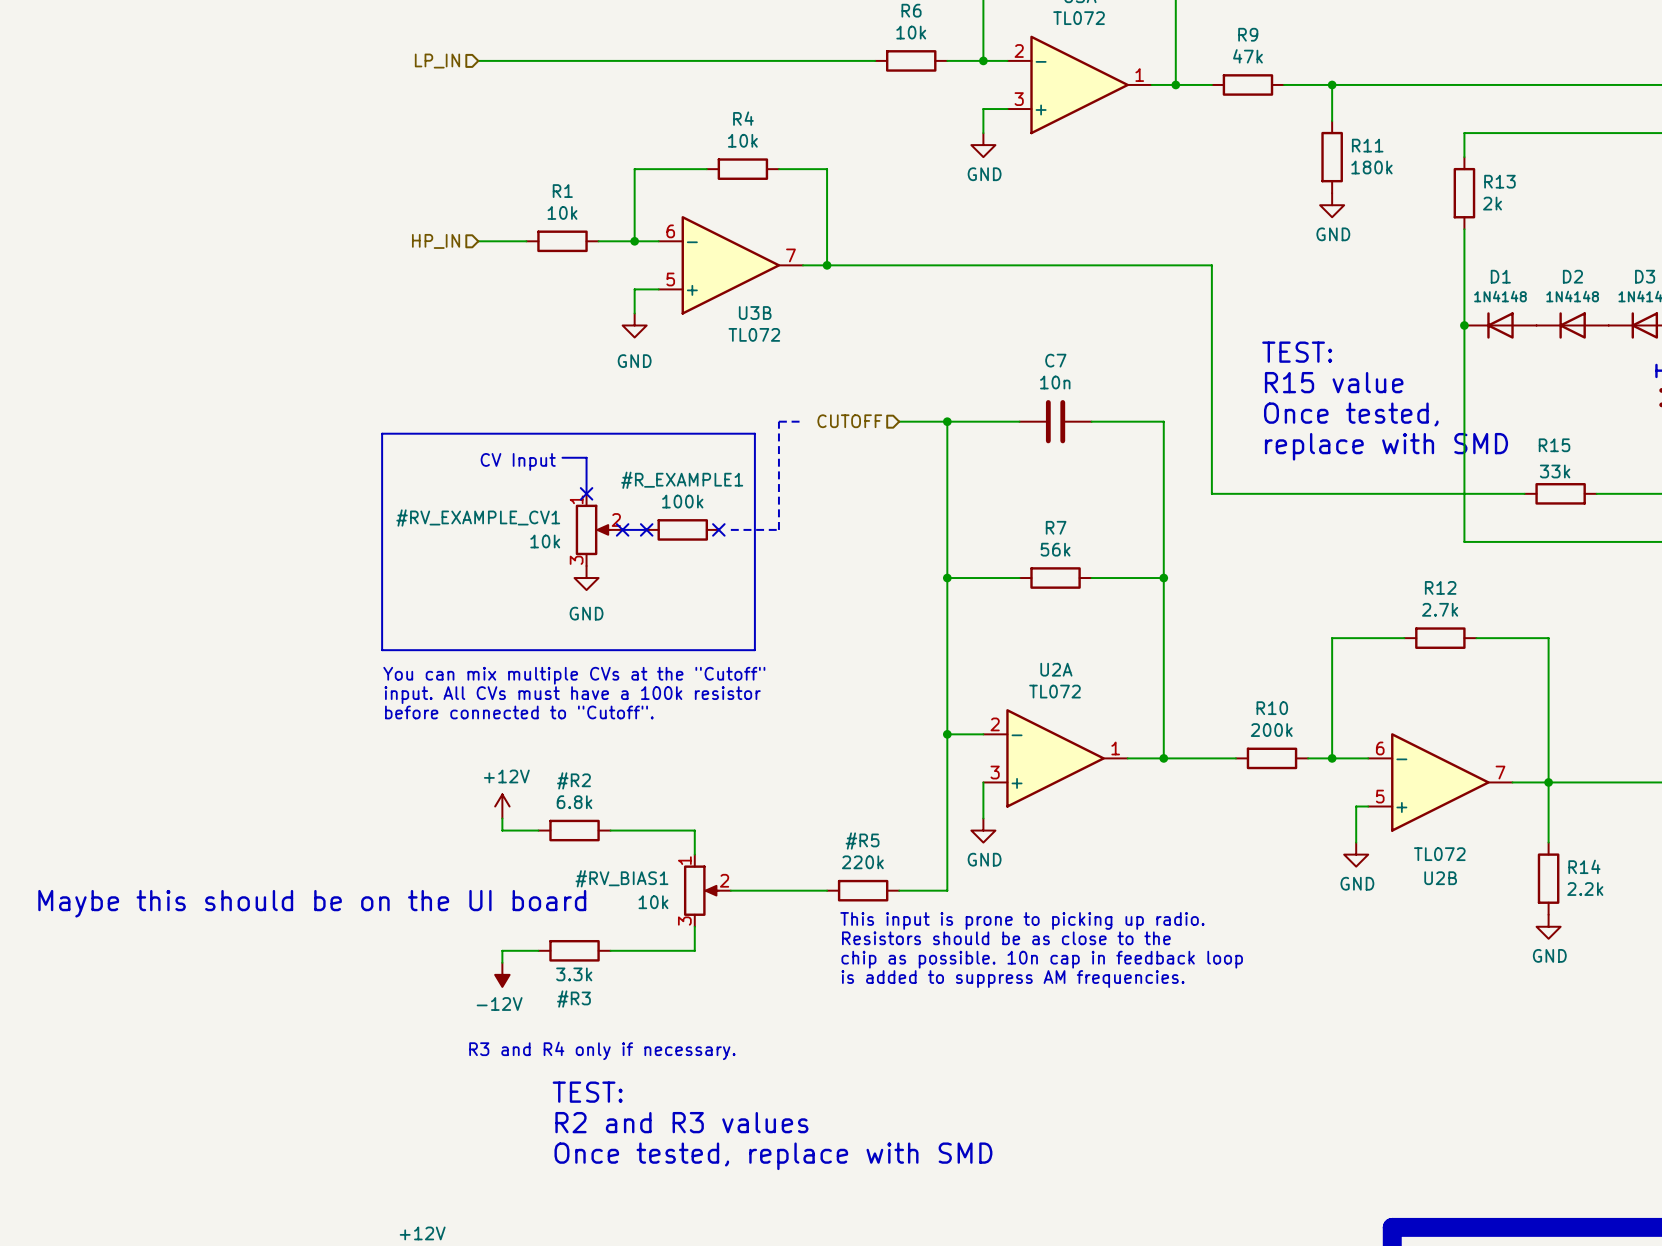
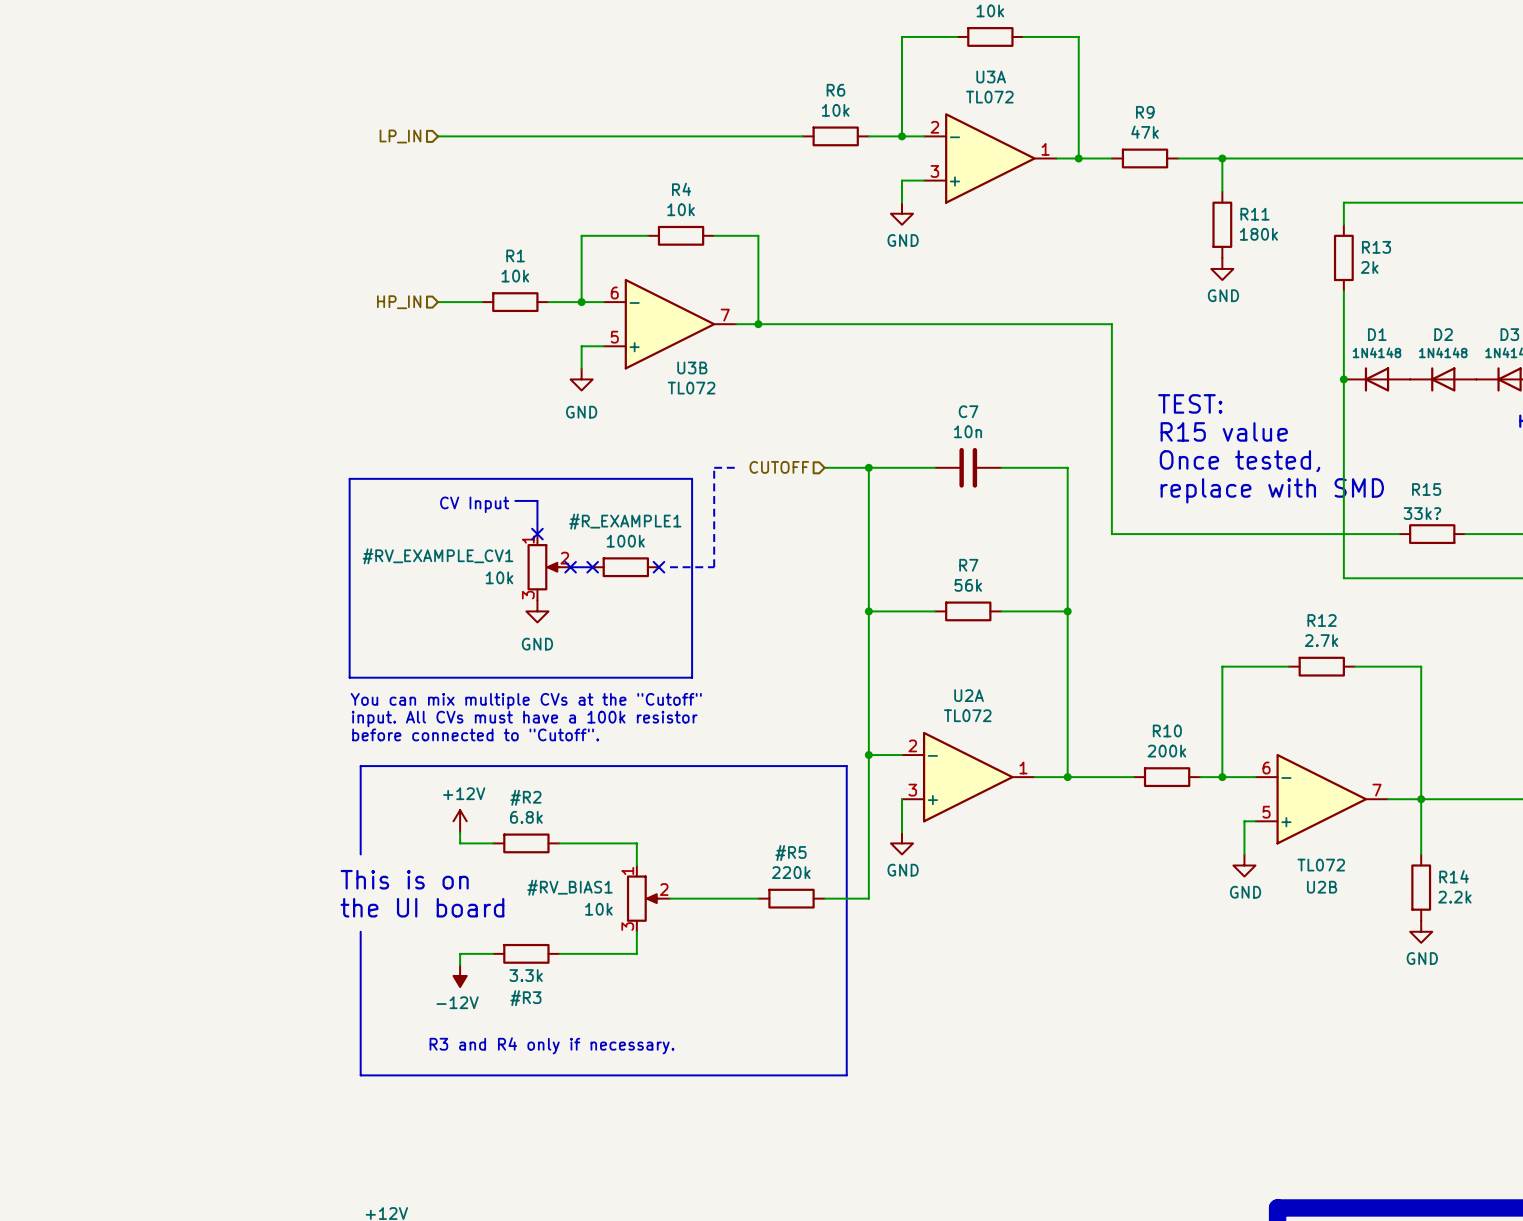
R15 value: 33k (1555, 471) -> 33k? (1422, 513)
line: none -> (360, 854) (360, 766) (846, 766) (846, 1075) (360, 1075) (360, 931)
text: none -> This is on (404, 879)
text: none -> the UI board (422, 907)
text: Maybe this should be on the UI board (312, 903) -> none
text: This input is prone to picking up radio. (1022, 920) -> none
text: Resistors should be as close to the (1006, 938) -> none
text: chip as possible. 10n cap in feedback loop (1042, 959) -> none
text: is added to suppress AM frequencies. (1012, 979) -> none
text: TEST: (587, 1092) -> none
text: R2 and R3 values (681, 1122) -> none
text: Once tested, replace with SMD (773, 1156) -> none

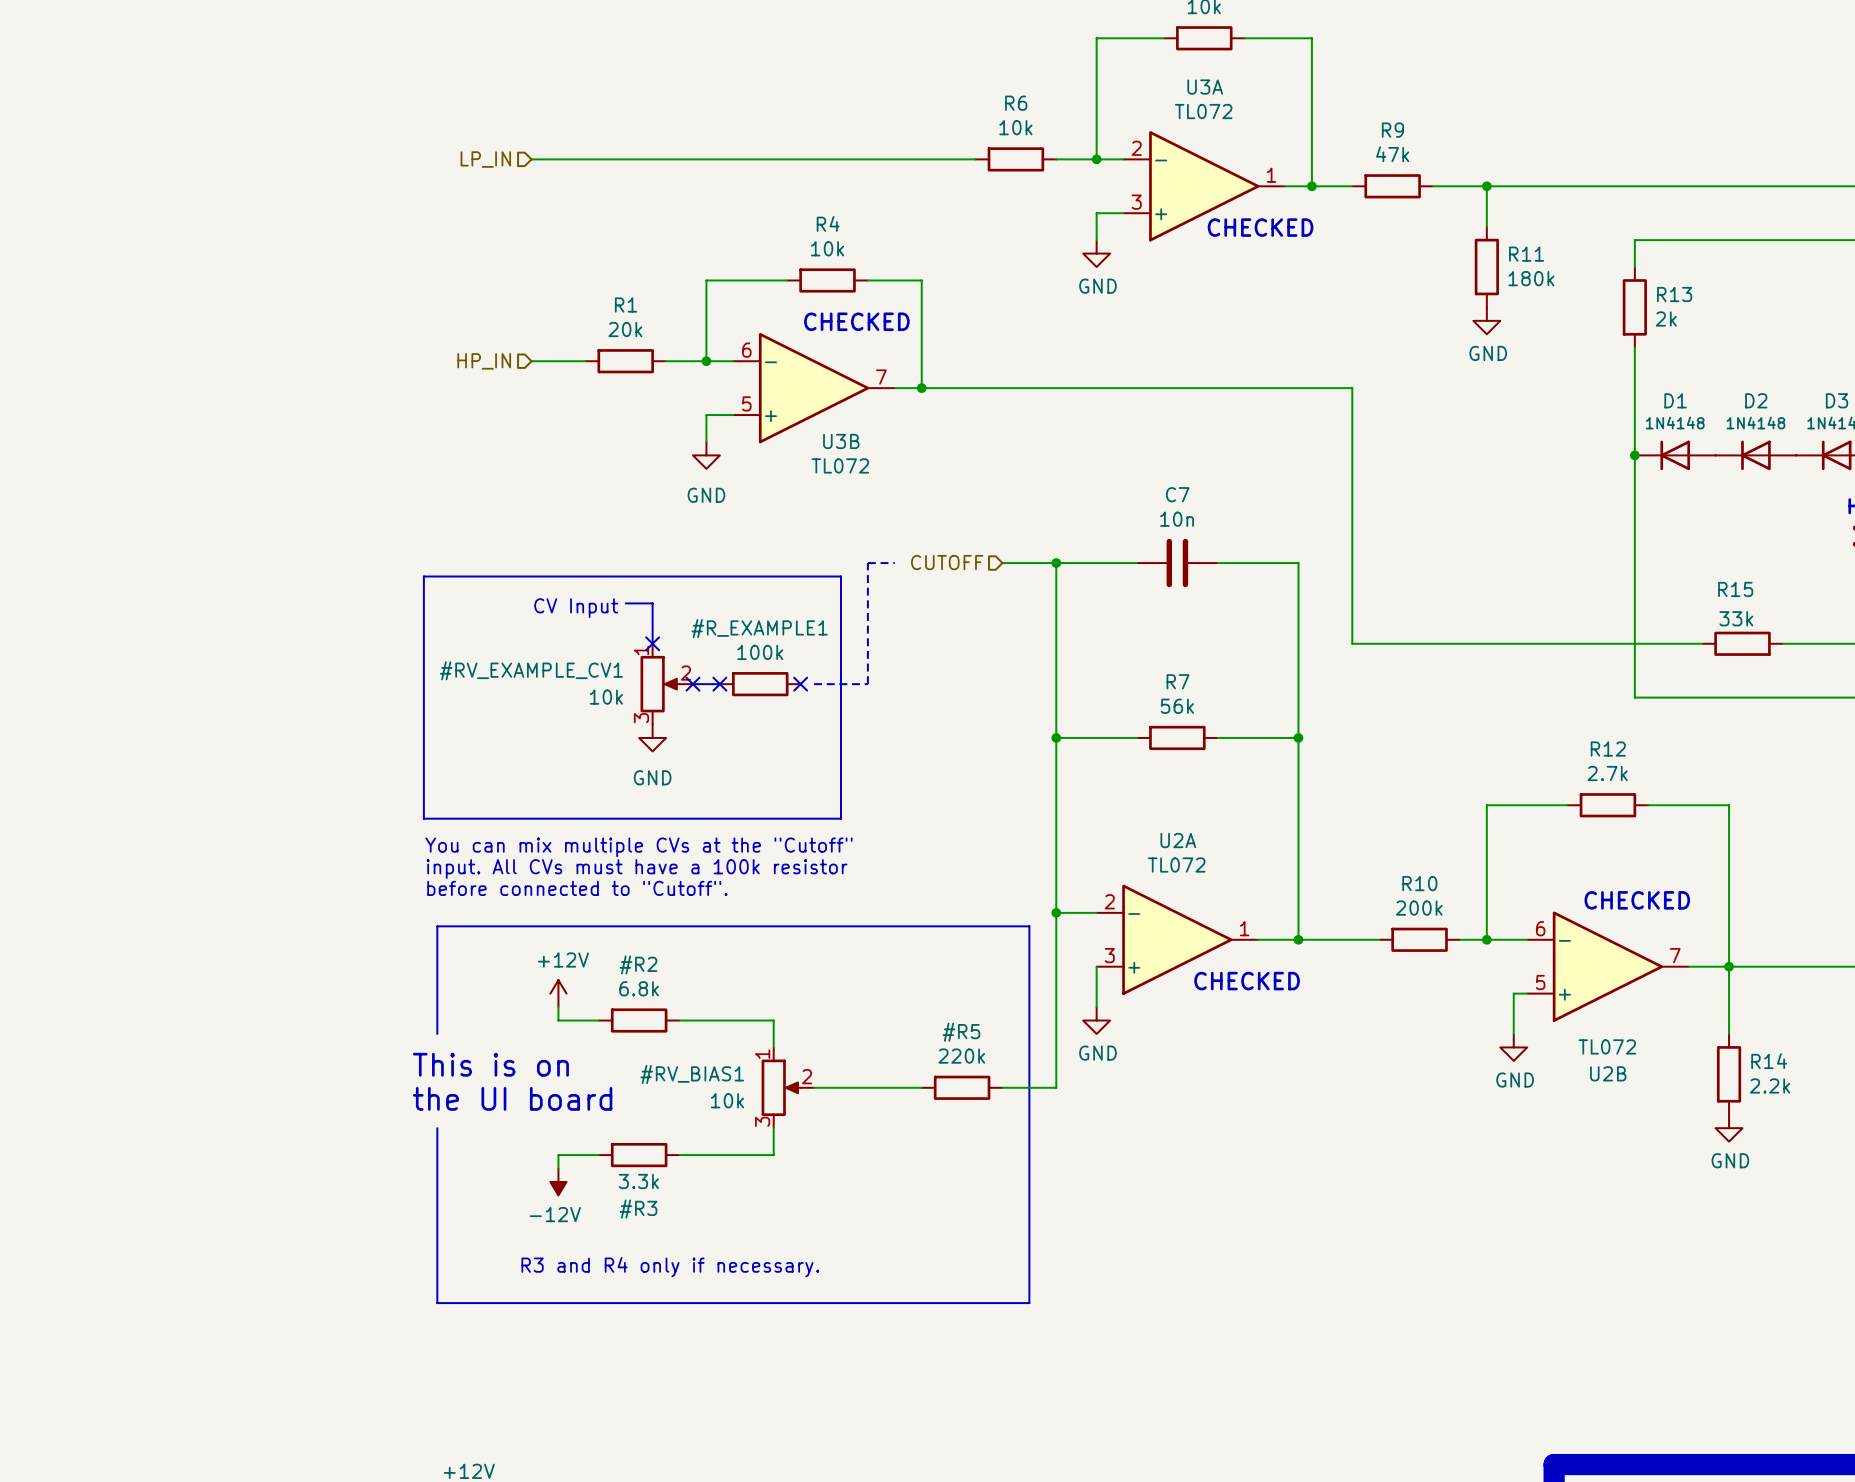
text: none -> CHECKED (1260, 227)
text: none -> CHECKED (856, 321)
R1 value: 10k (515, 276) -> 20k (625, 329)
text: TEST: (1190, 403) -> none
text: R15 value (1224, 431) -> none
text: Once tested, (1239, 461) -> none
text: replace with SMD (1272, 490) -> none
R15 value: 33k? (1422, 513) -> 33k (1736, 618)
text: none -> CHECKED (1637, 900)
text: none -> CHECKED (1247, 981)

